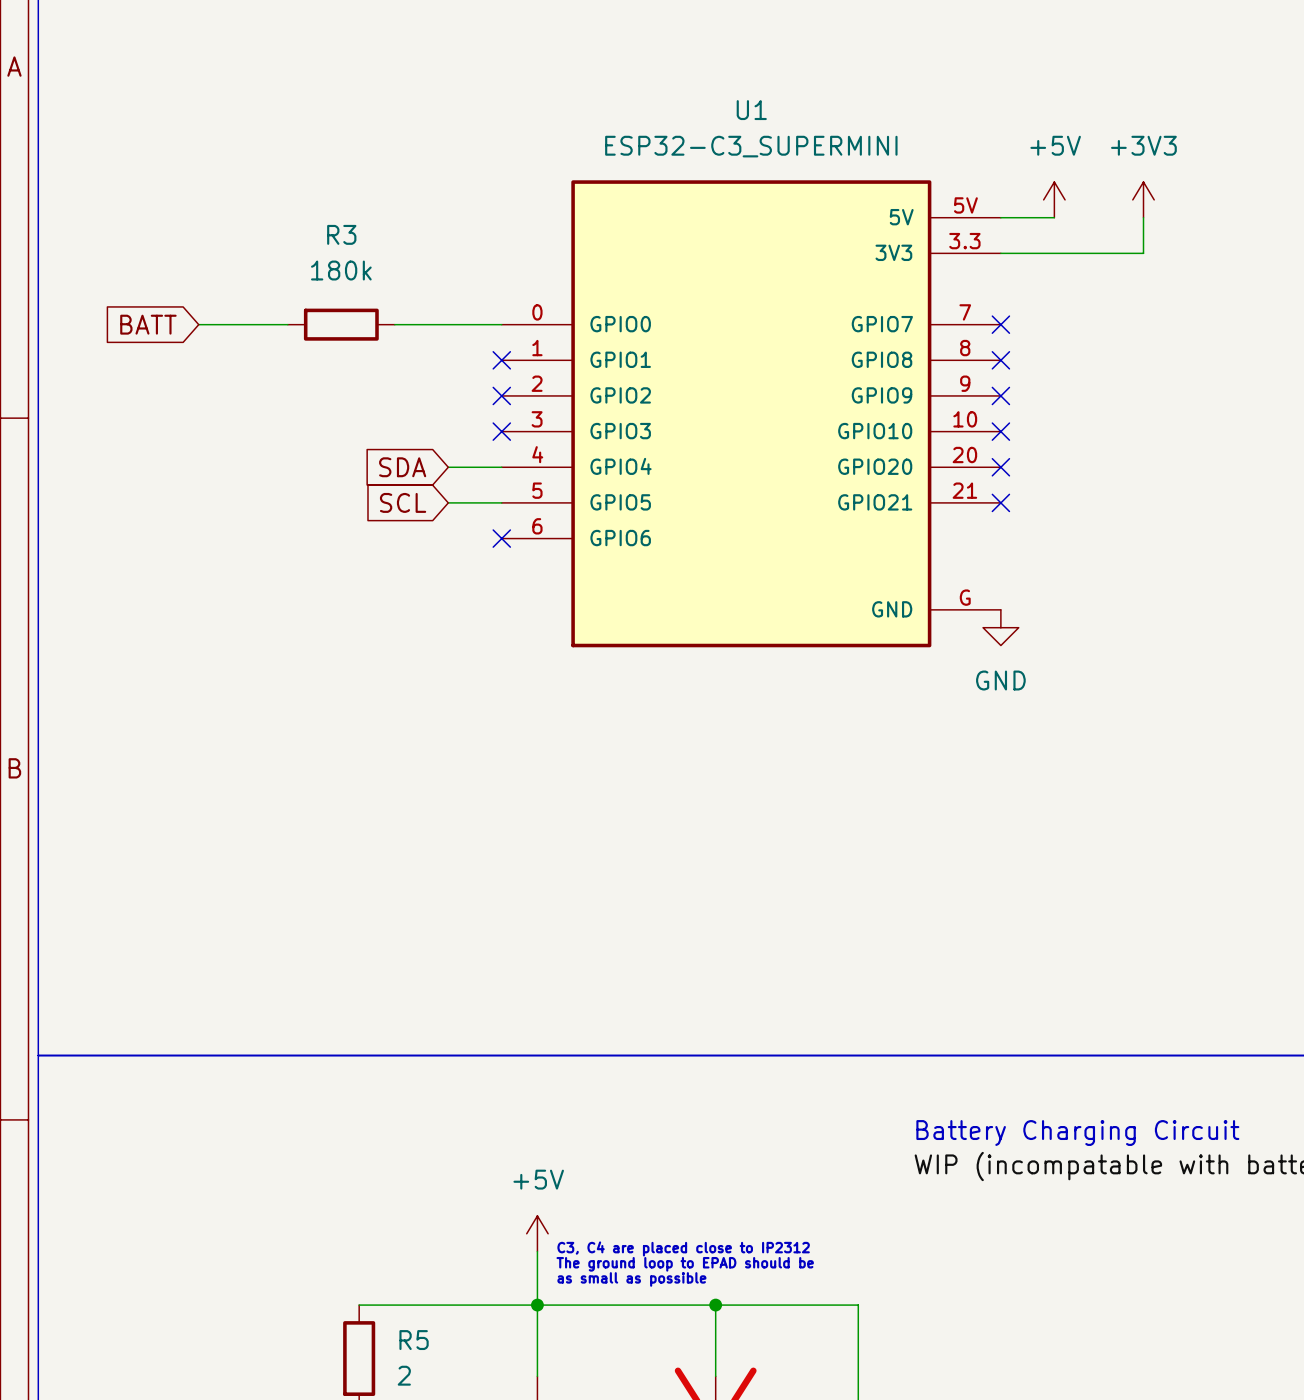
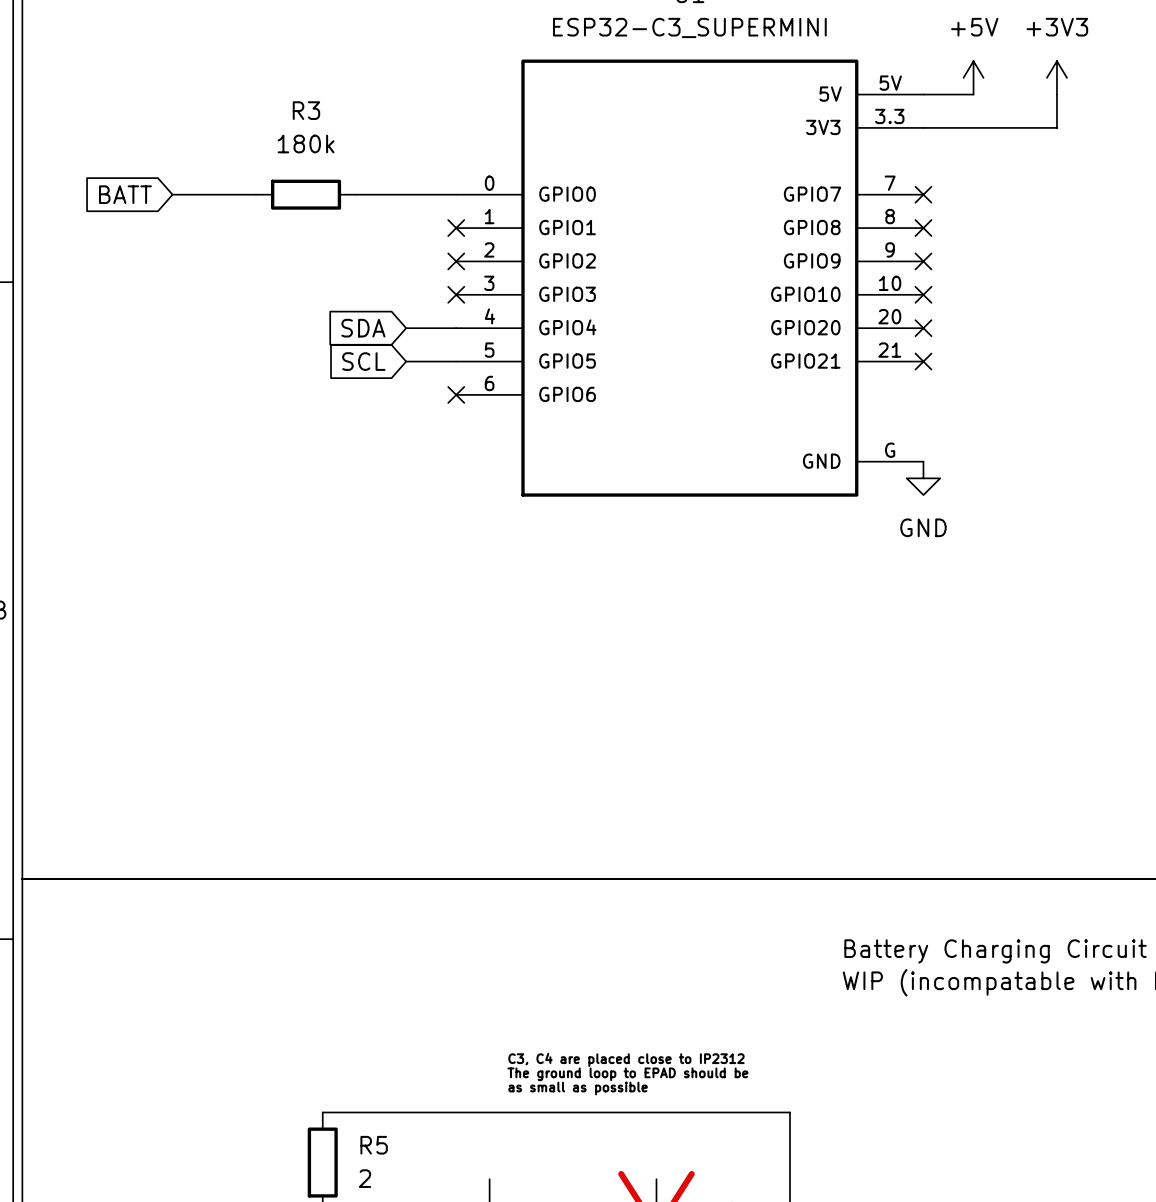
power symbol: +5V (537, 1233) -> none
wire: (537, 1251) (537, 1376) -> none
junction: (537, 1305) -> none
wire: (715, 1305) (715, 1376) -> none
junction: (715, 1305) -> none

